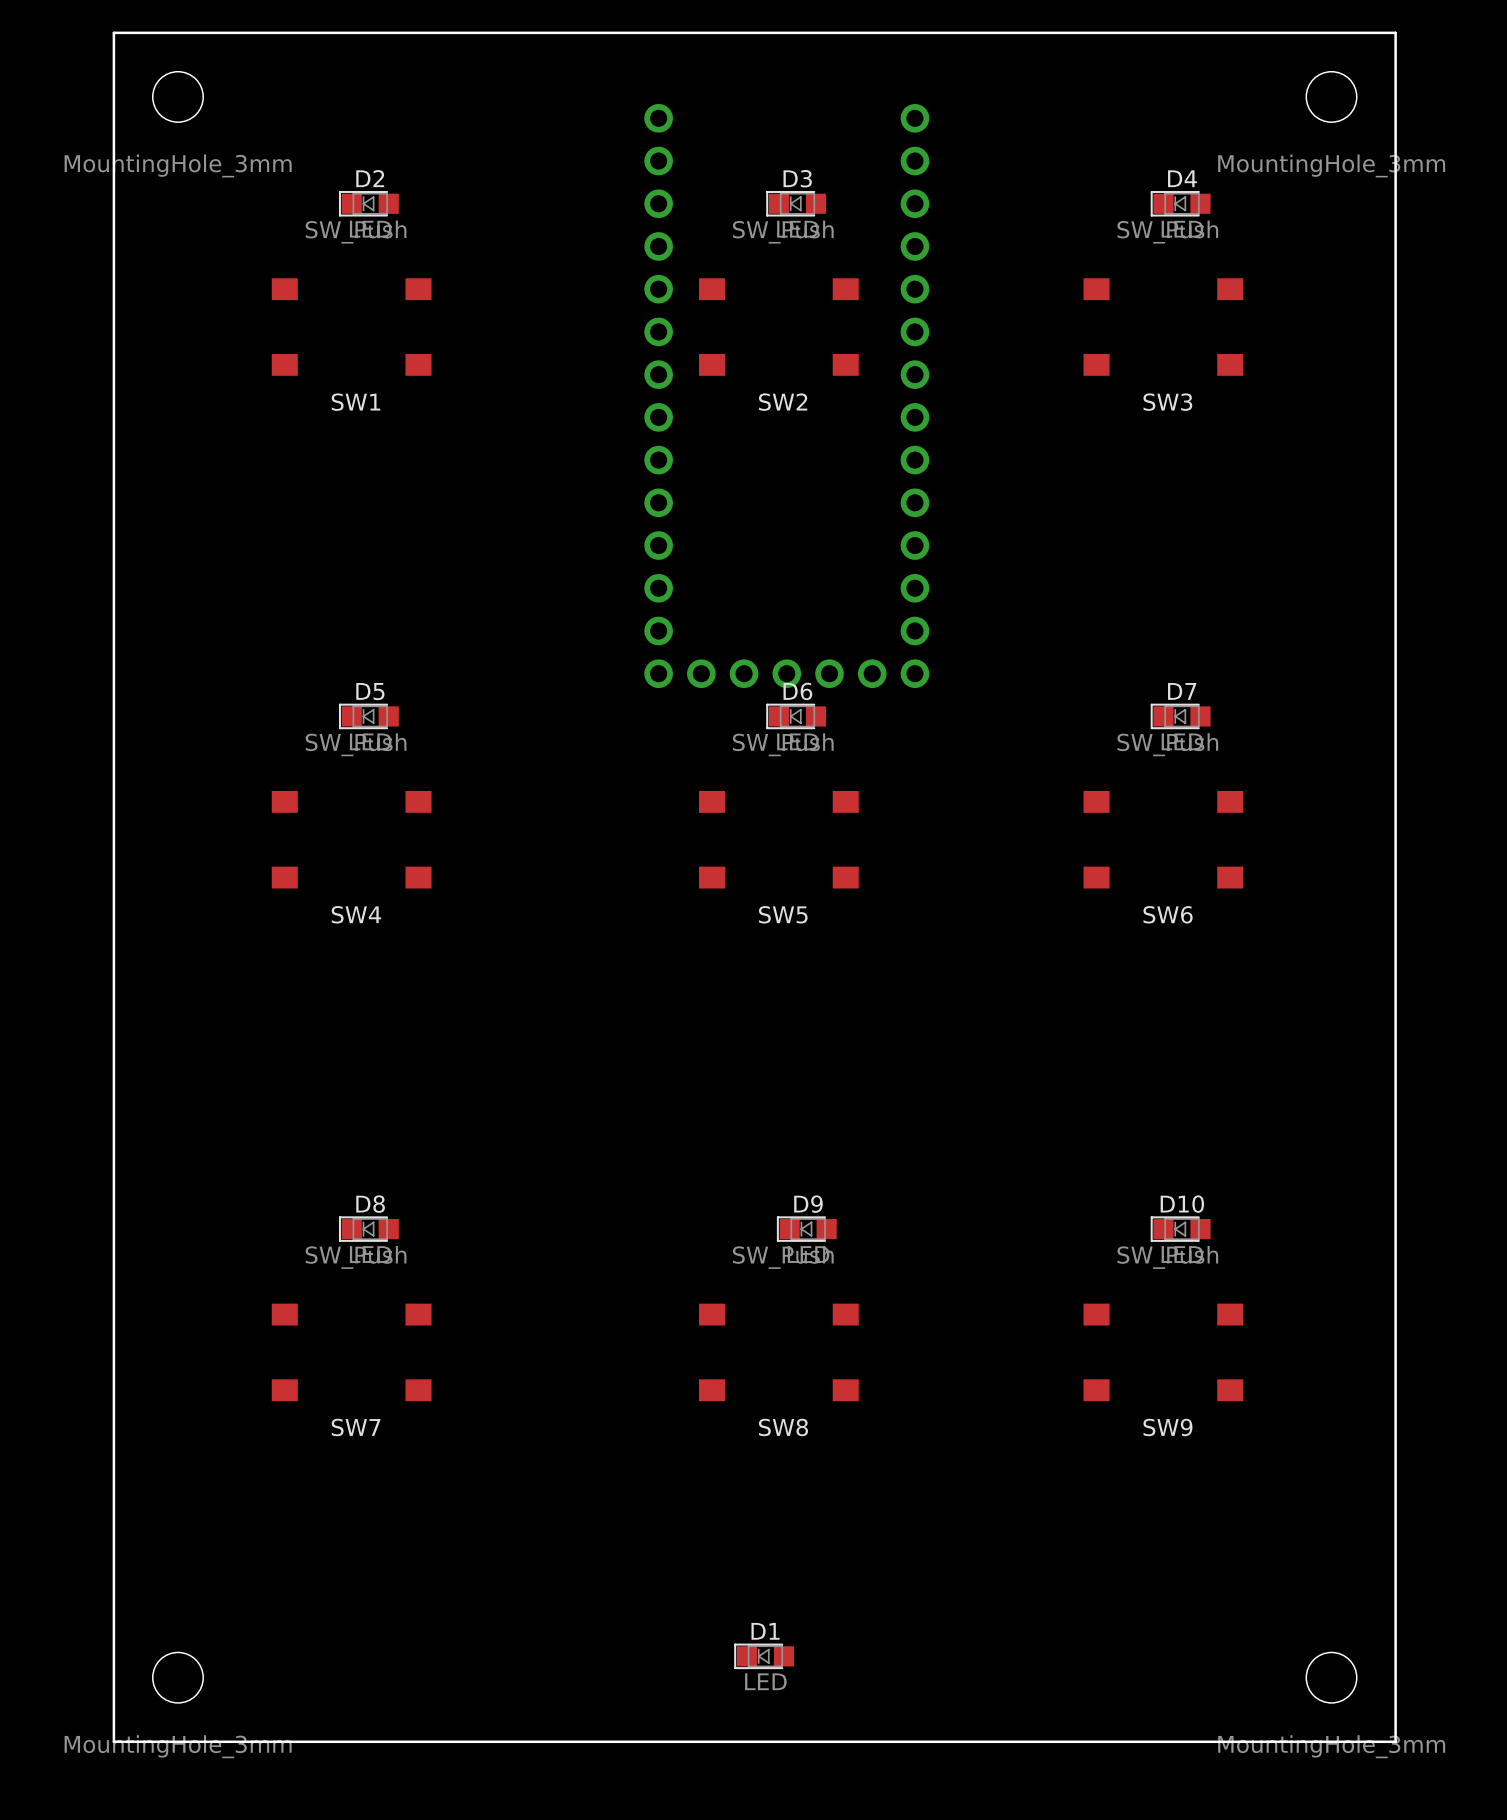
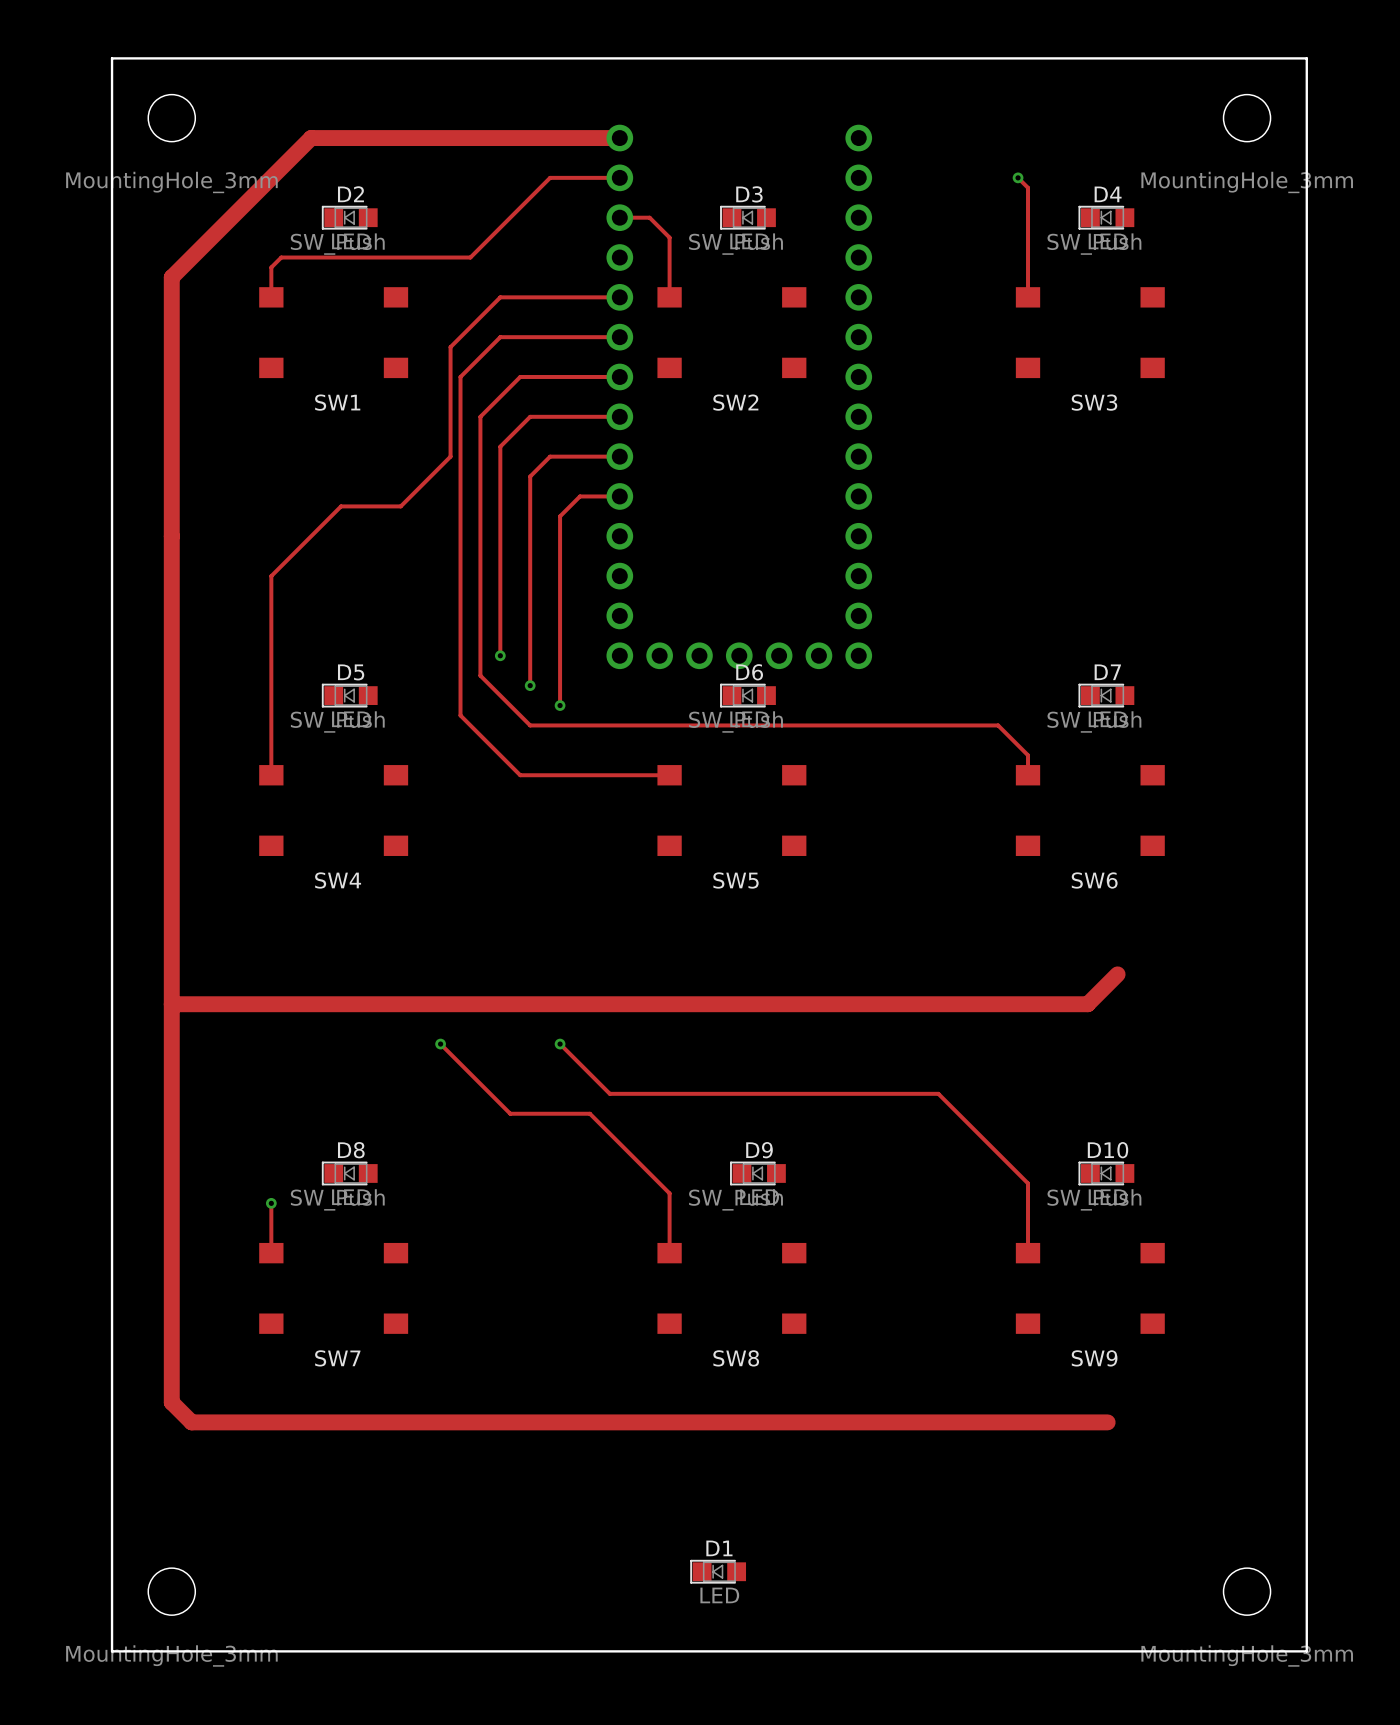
track: none -> (619, 138) (311, 138) (171, 277) (171, 1402) (191, 1422) (1107, 1422)
track: none -> (619, 177) (550, 177) (470, 257) (281, 257) (271, 267) (271, 297)
track: none -> (1018, 177) (1028, 187) (1028, 297)
via: none -> (1018, 177)
track: none -> (619, 217) (649, 217) (669, 237) (669, 297)
track: none -> (619, 297) (500, 297) (450, 347) (450, 456) (400, 506) (341, 506) (271, 576) (271, 775)
track: none -> (619, 337) (500, 337) (460, 376) (460, 715) (520, 775) (669, 775)
track: none -> (619, 376) (520, 376) (480, 416) (480, 675) (530, 725) (998, 725) (1028, 755) (1028, 775)
track: none -> (619, 416) (530, 416) (500, 446) (500, 655)
track: none -> (619, 456) (550, 456) (530, 476) (530, 685)
track: none -> (619, 496) (579, 496) (560, 516) (560, 705)
via: none -> (500, 655)
via: none -> (530, 685)
via: none -> (560, 705)
track: none -> (1117, 974) (1087, 1004) (171, 1004)
track: none -> (440, 1044) (510, 1113) (589, 1113) (669, 1193) (669, 1253)
via: none -> (440, 1044)
track: none -> (560, 1044) (609, 1093) (938, 1093) (1028, 1183) (1028, 1253)
via: none -> (560, 1044)
track: none -> (271, 1203) (271, 1253)
via: none -> (271, 1203)

